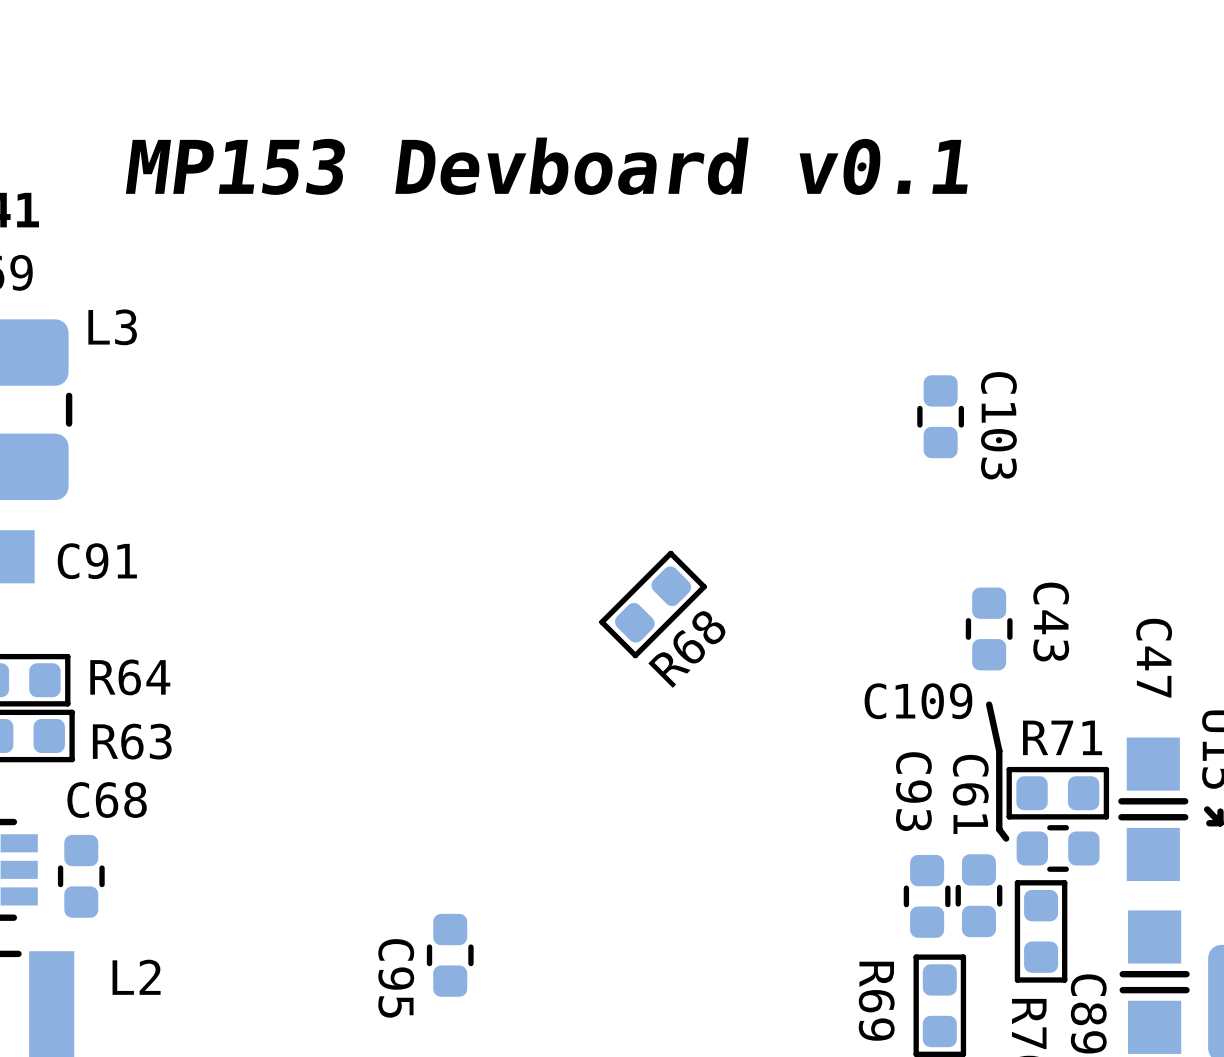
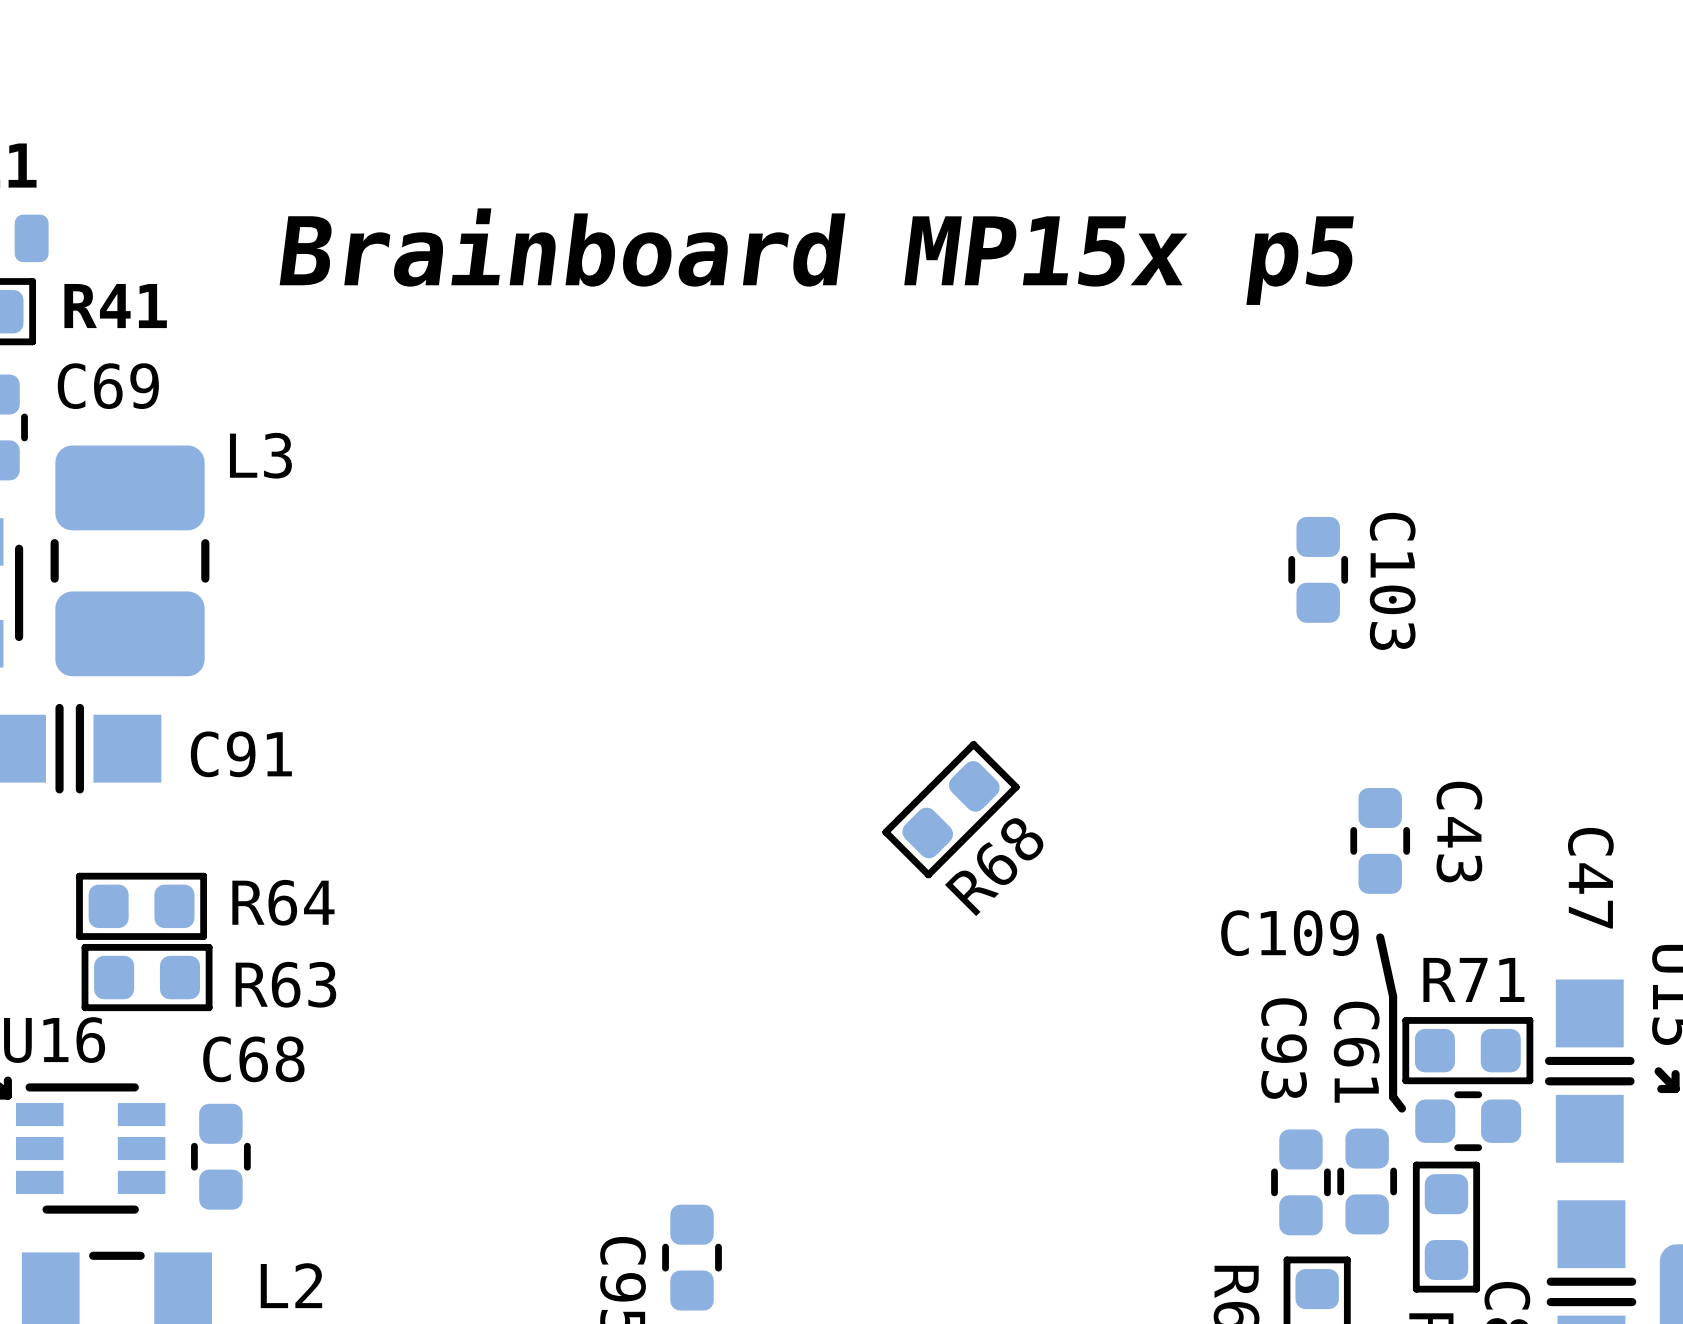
text: MP153 Devboard v0.1 (546, 166) -> Brainboard MP15x p5 (816, 256)

